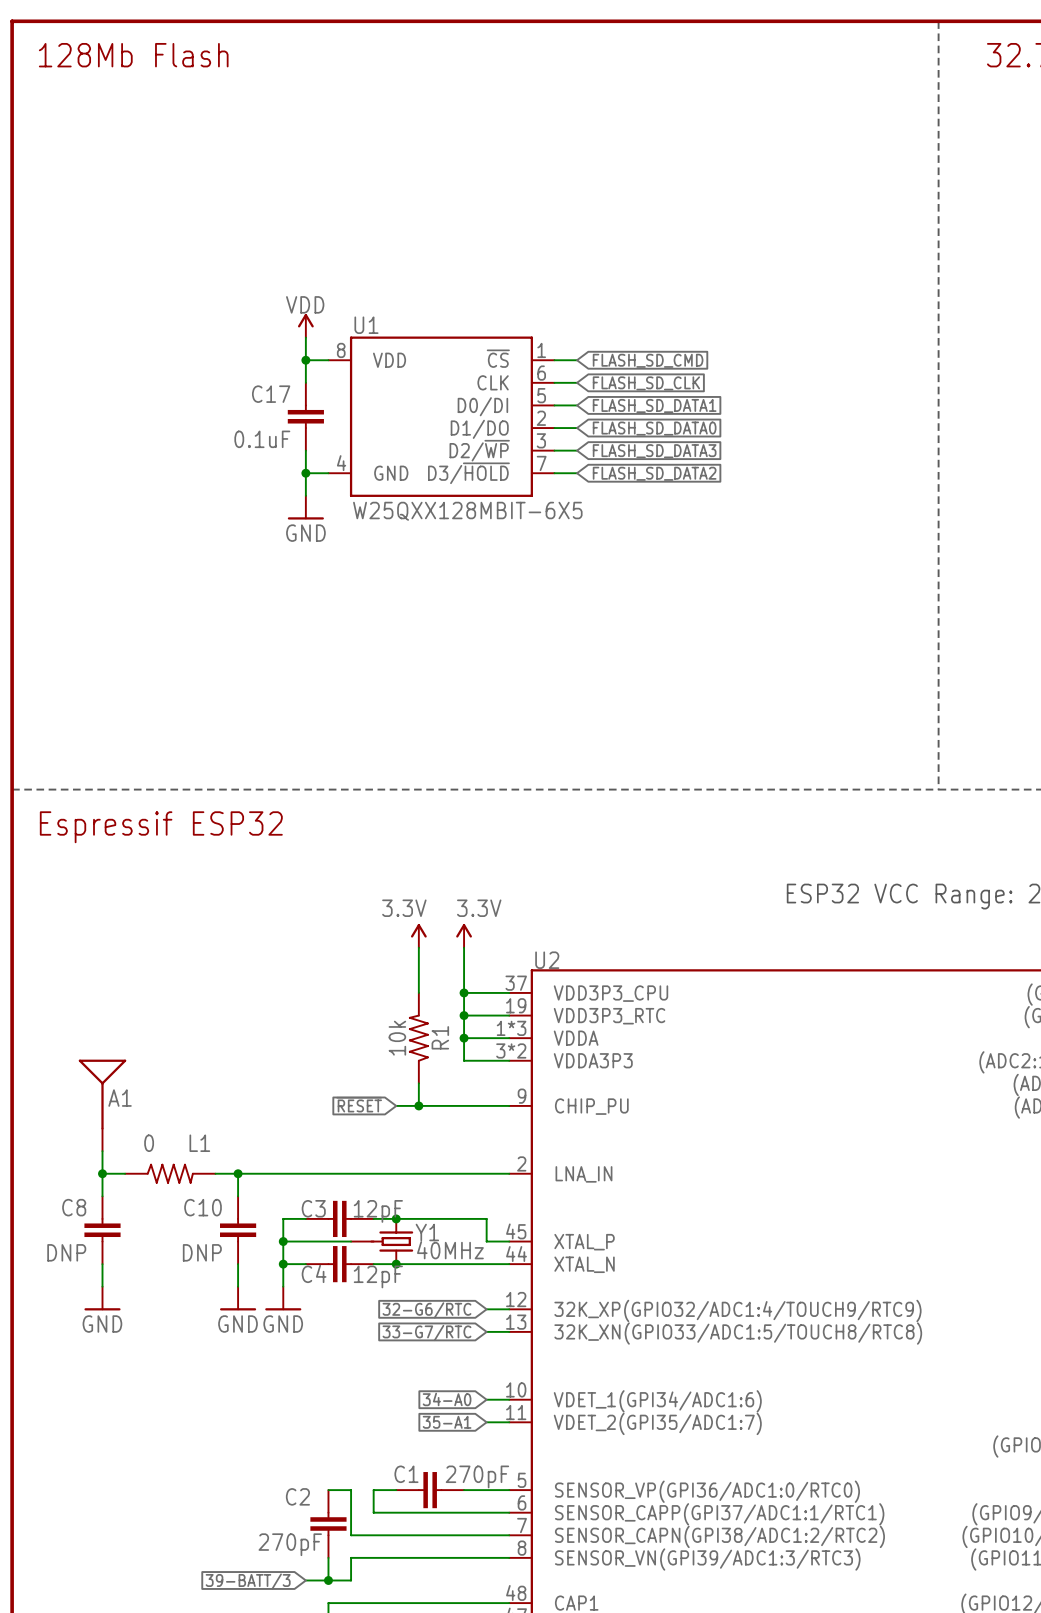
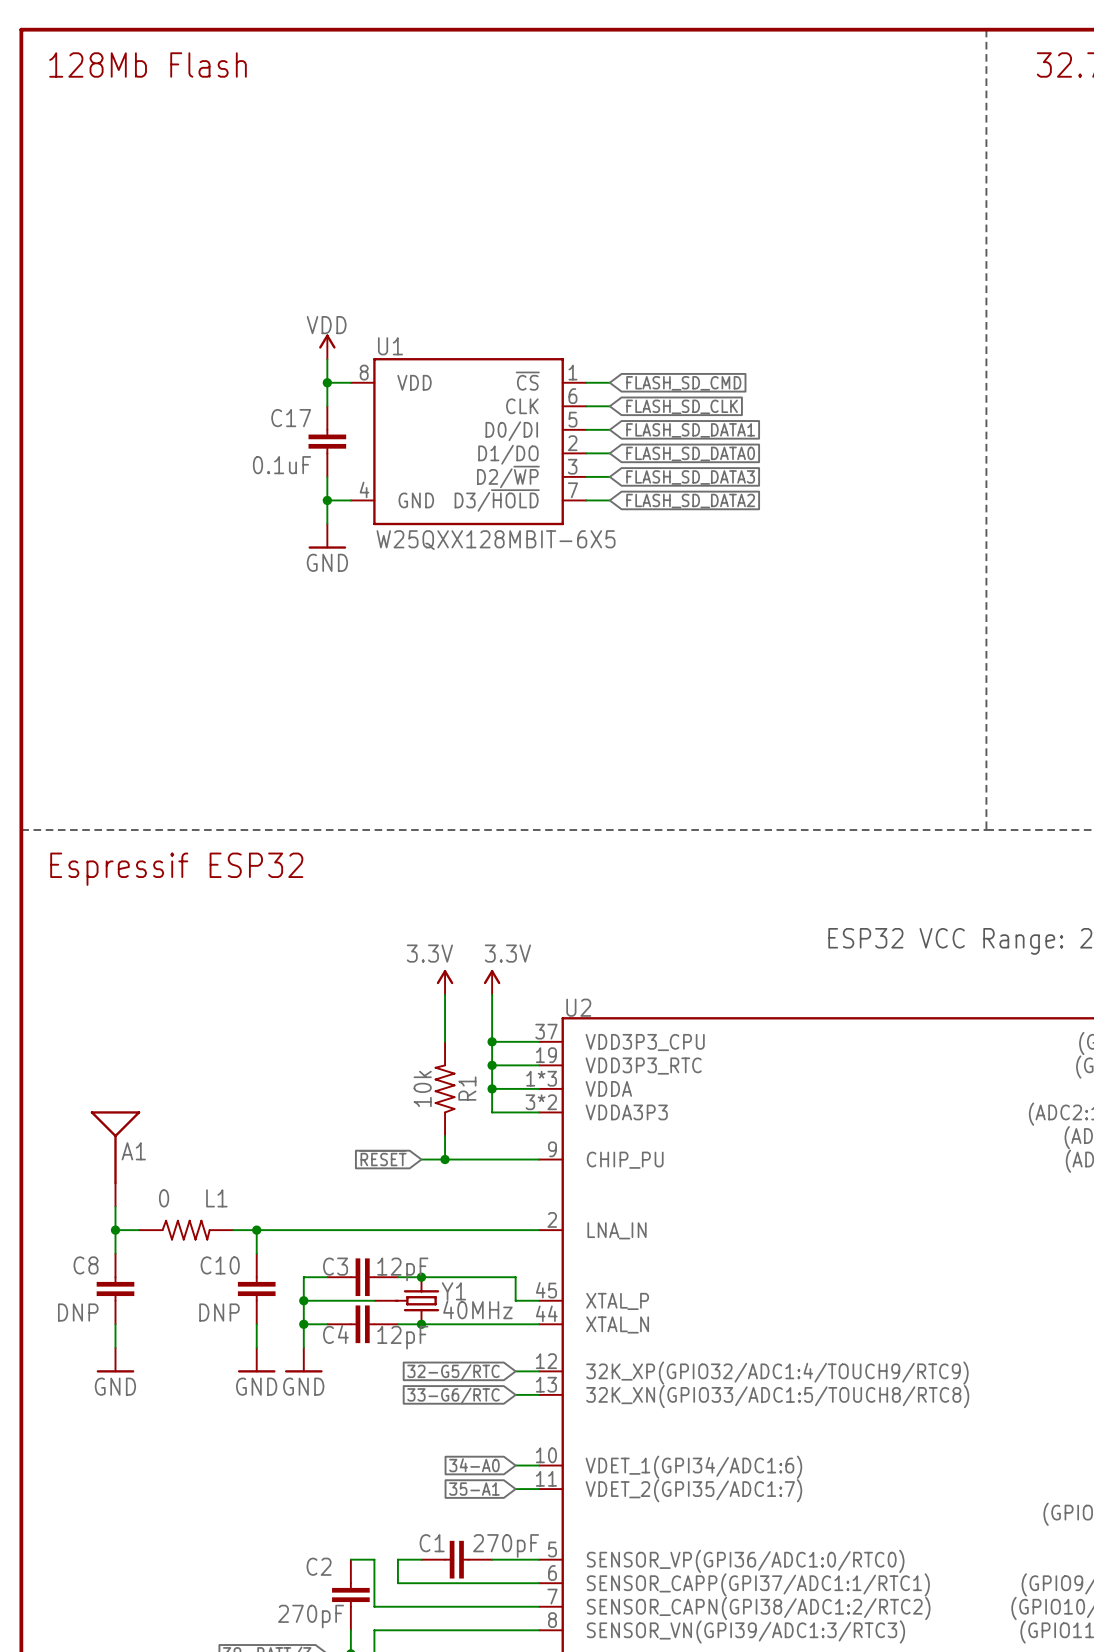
global label: 32-G6/RTC (426, 1310) -> 32-G5/RTC (453, 1372)
global label: 33-G7/RTC (426, 1333) -> 33-G6/RTC (453, 1396)

